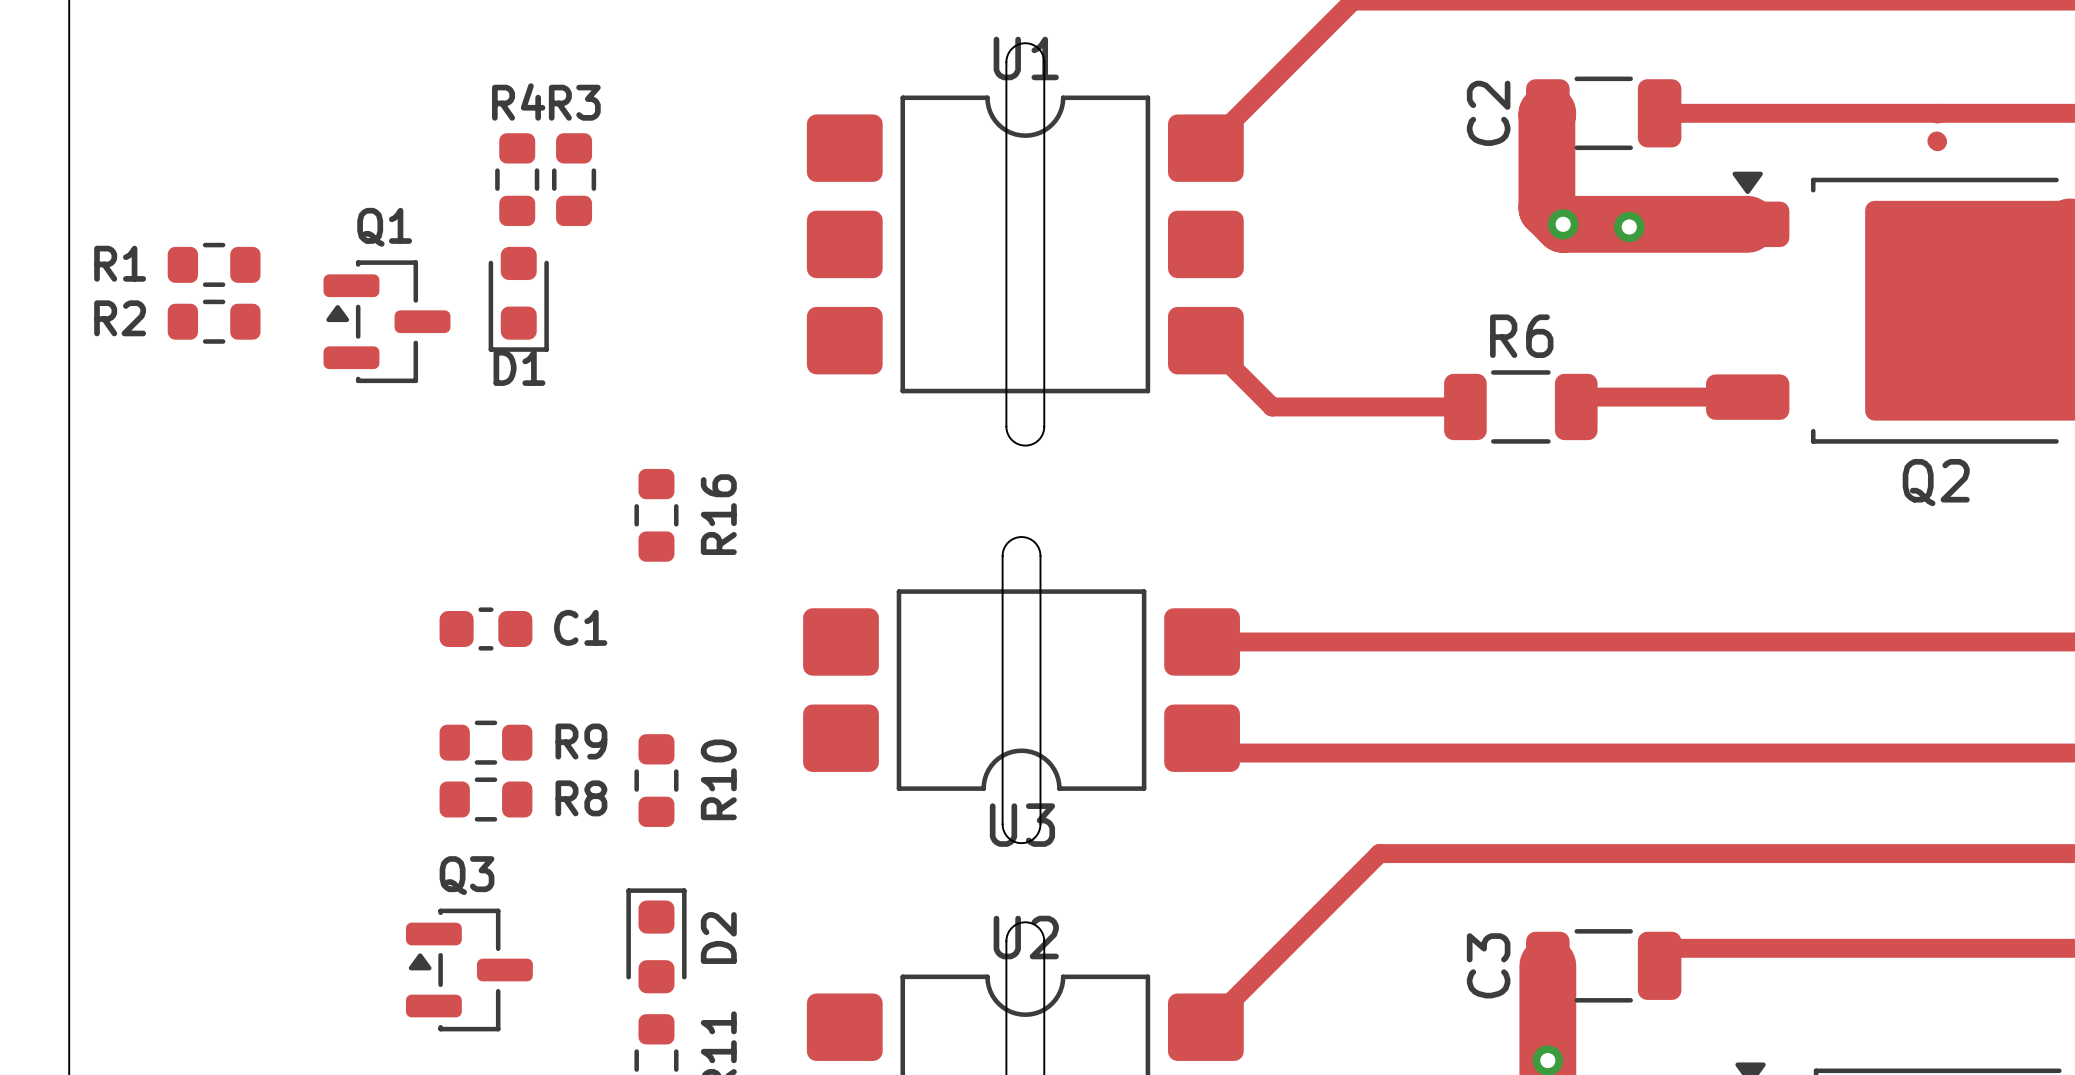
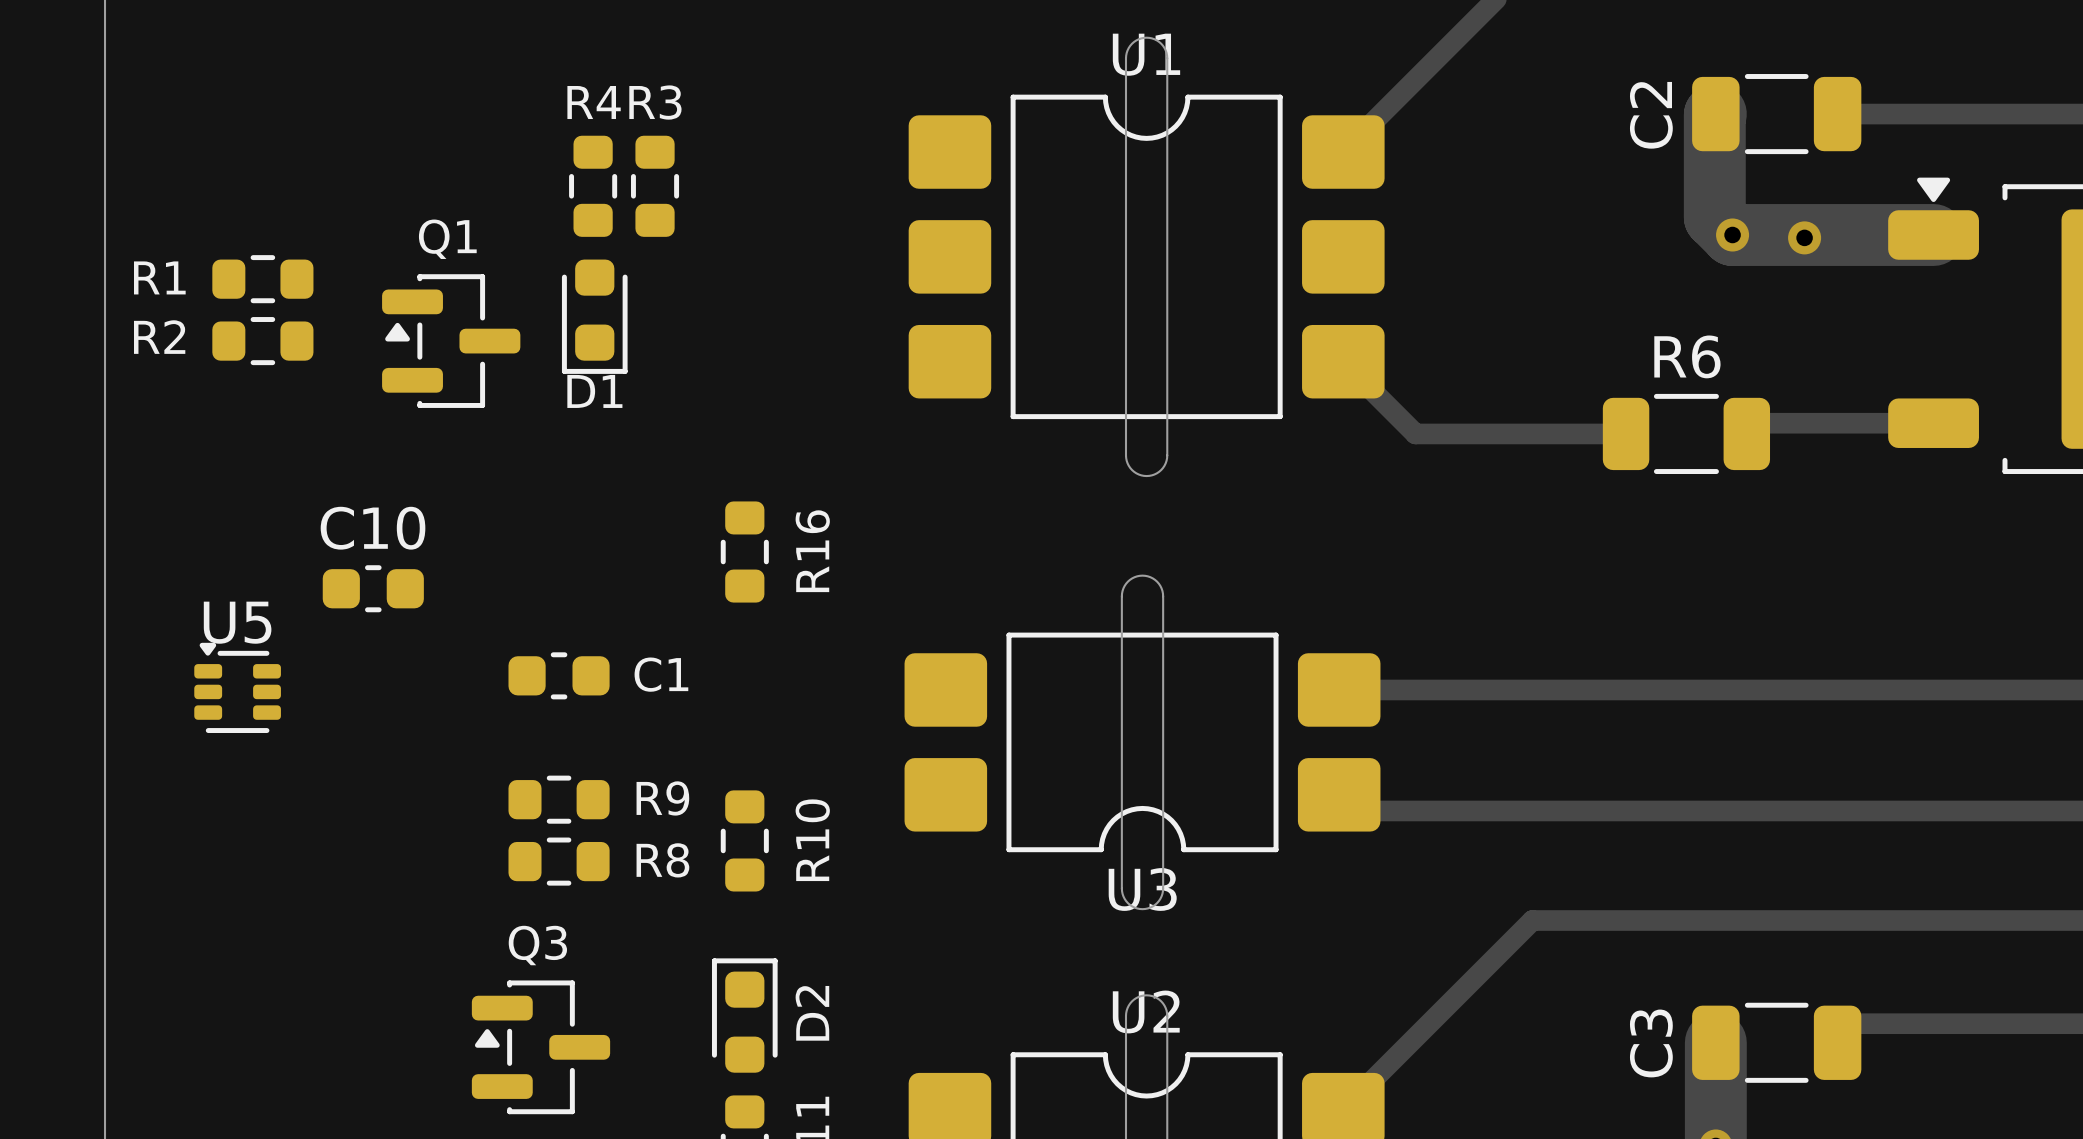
C10: none -> (373, 588)
U5: none -> (237, 687)

